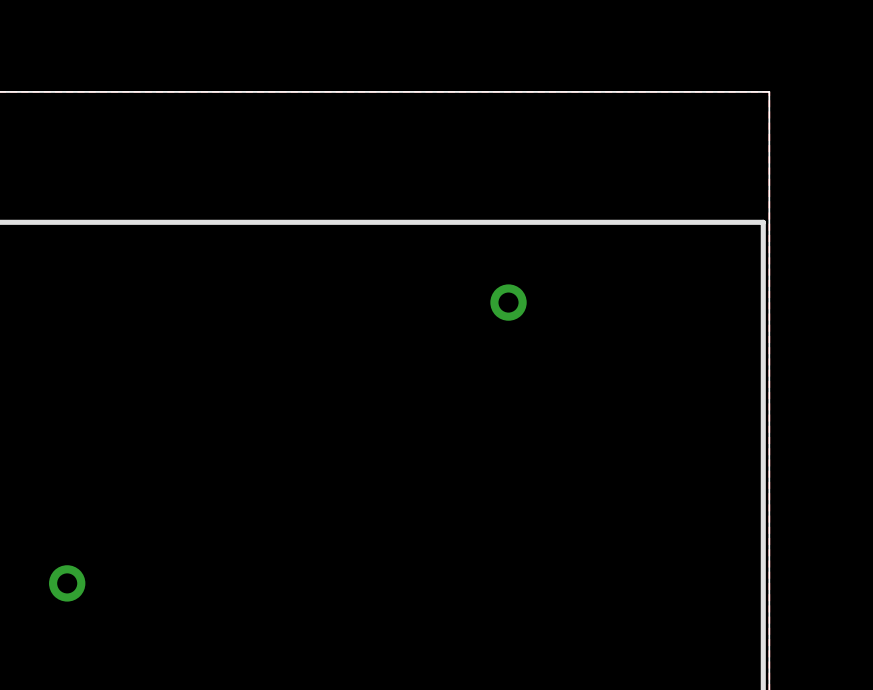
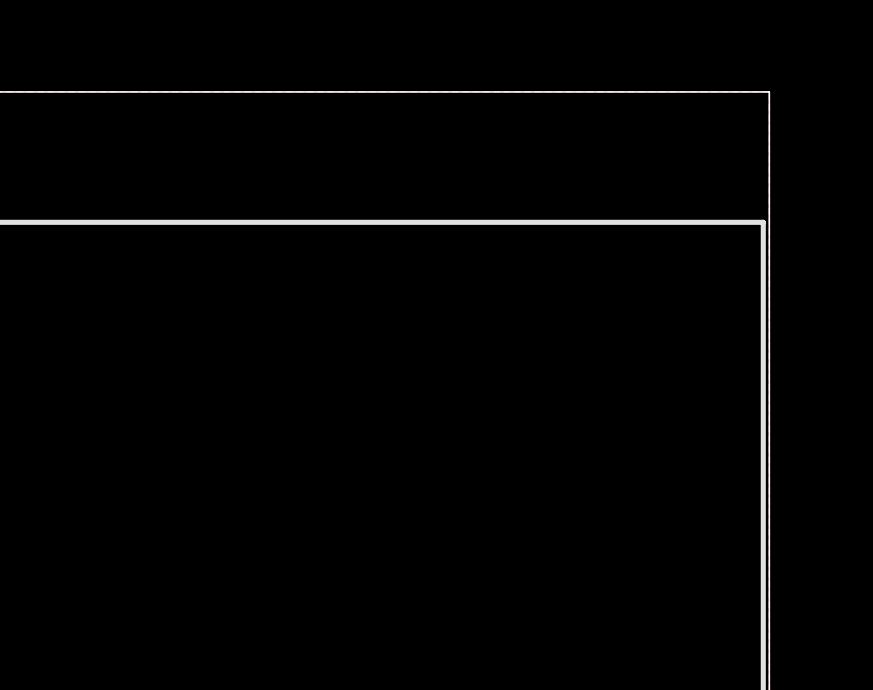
via: (508, 302) -> none
via: (67, 583) -> none

